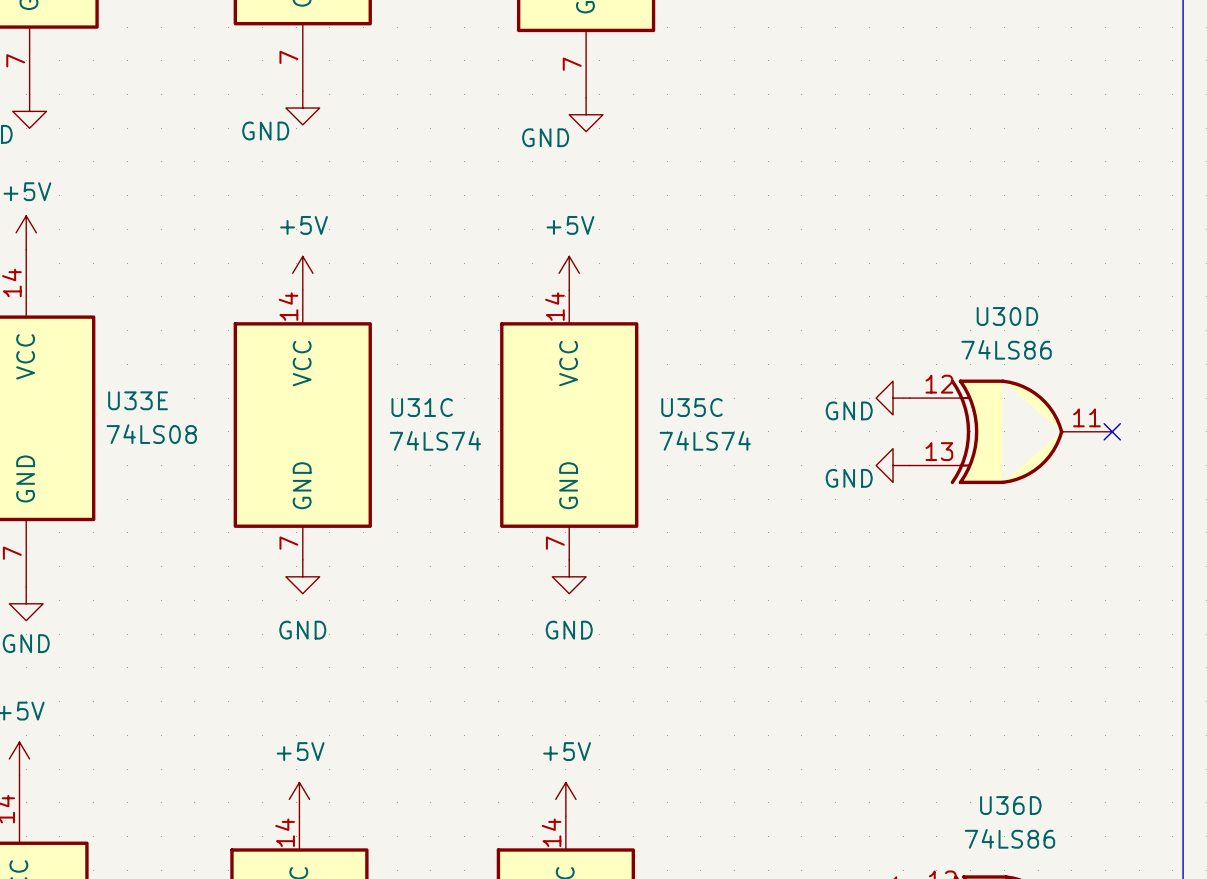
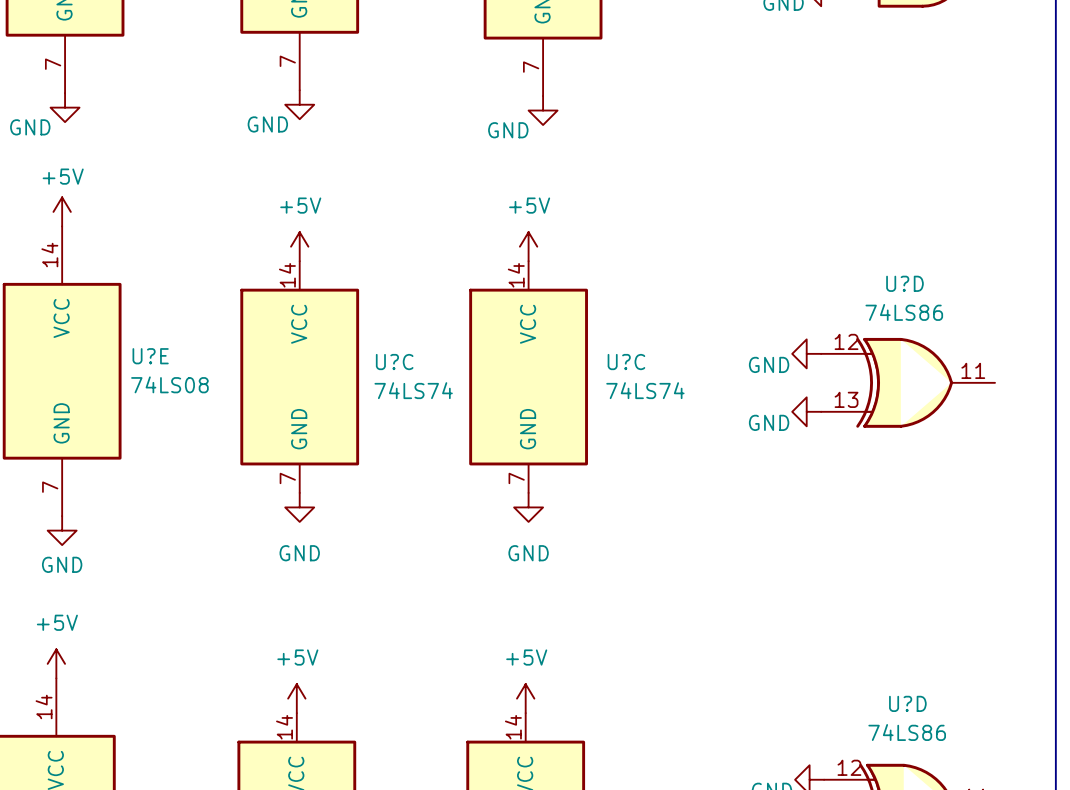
U30D name: U30D (1007, 316) -> U?D (904, 283)
U33E name: U33E (138, 400) -> U?E (150, 356)
U31C name: U31C (422, 407) -> U?C (394, 362)
U35C name: U35C (691, 407) -> U?C (626, 362)
no-connect mark: (1112, 431) -> none
U36D name: U36D (1010, 805) -> U?D (907, 703)

